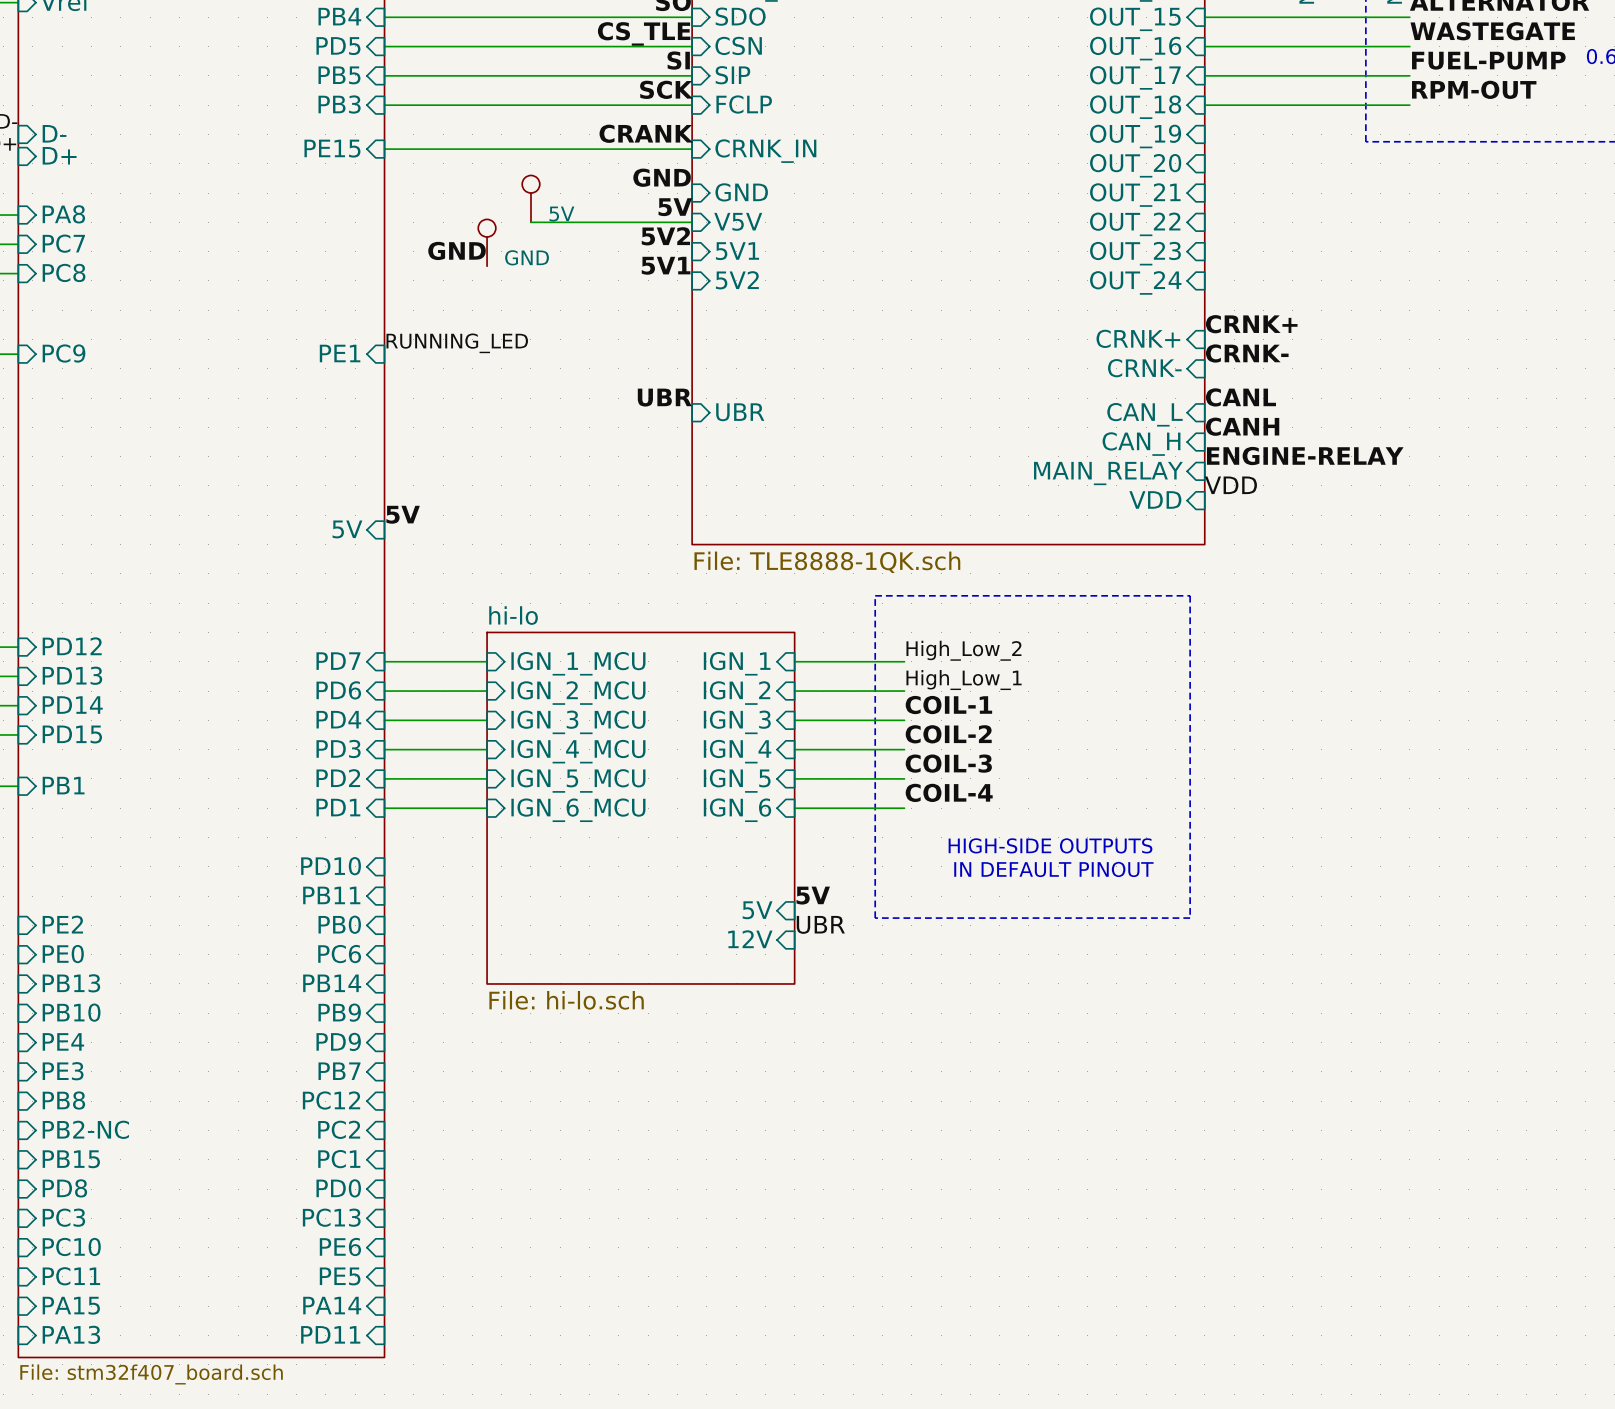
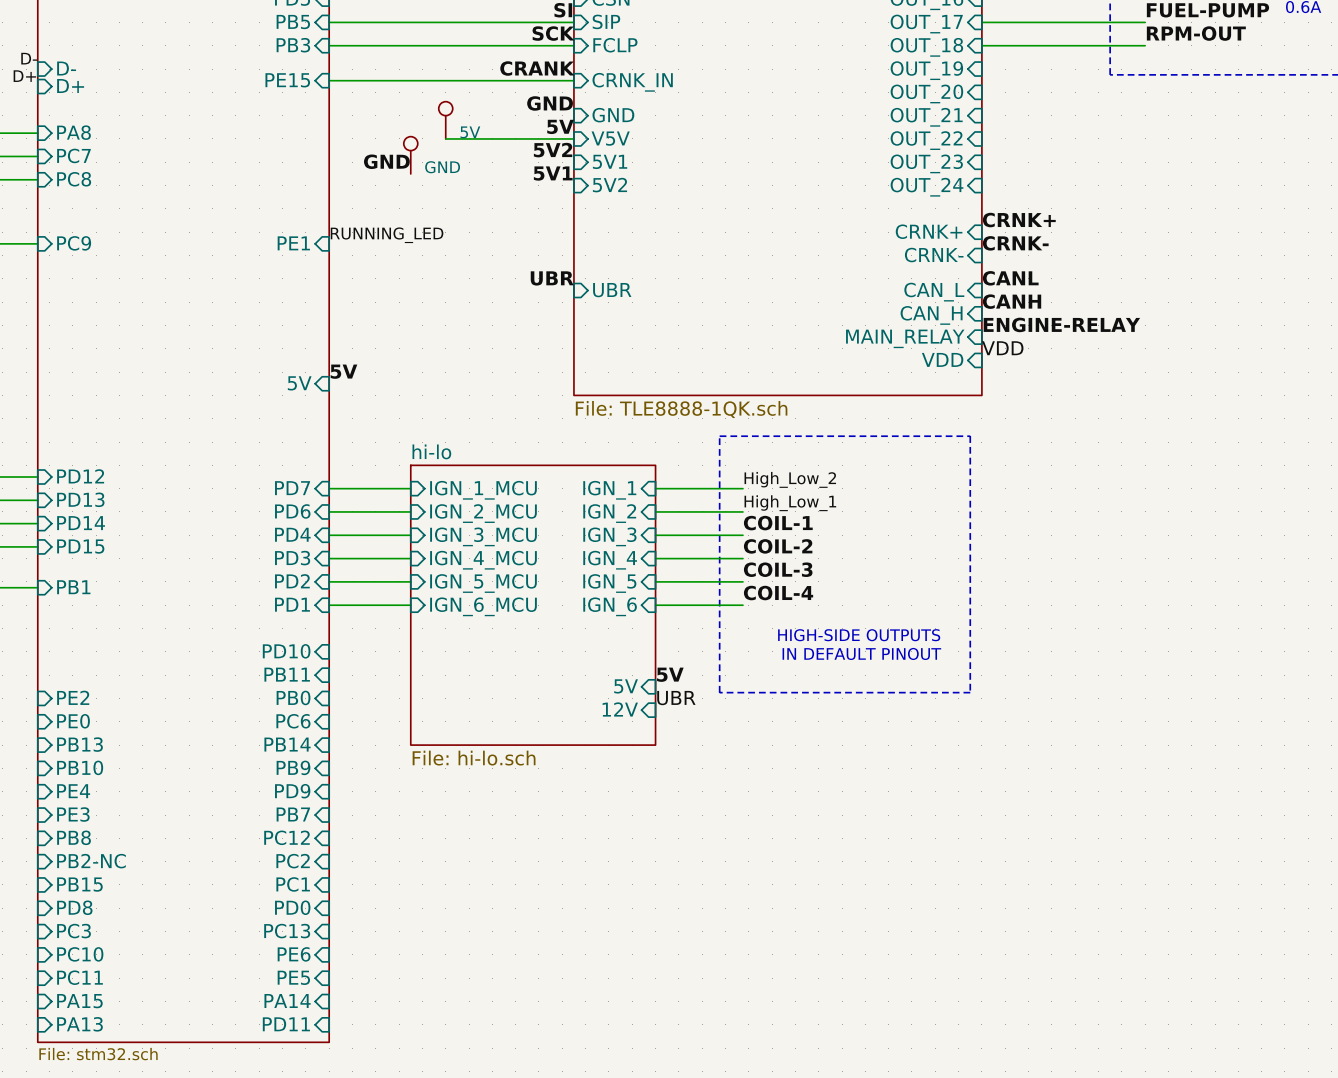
sheet value: File: stm32f407_board.sch (151, 1374) -> File: stm32.sch (98, 1054)

